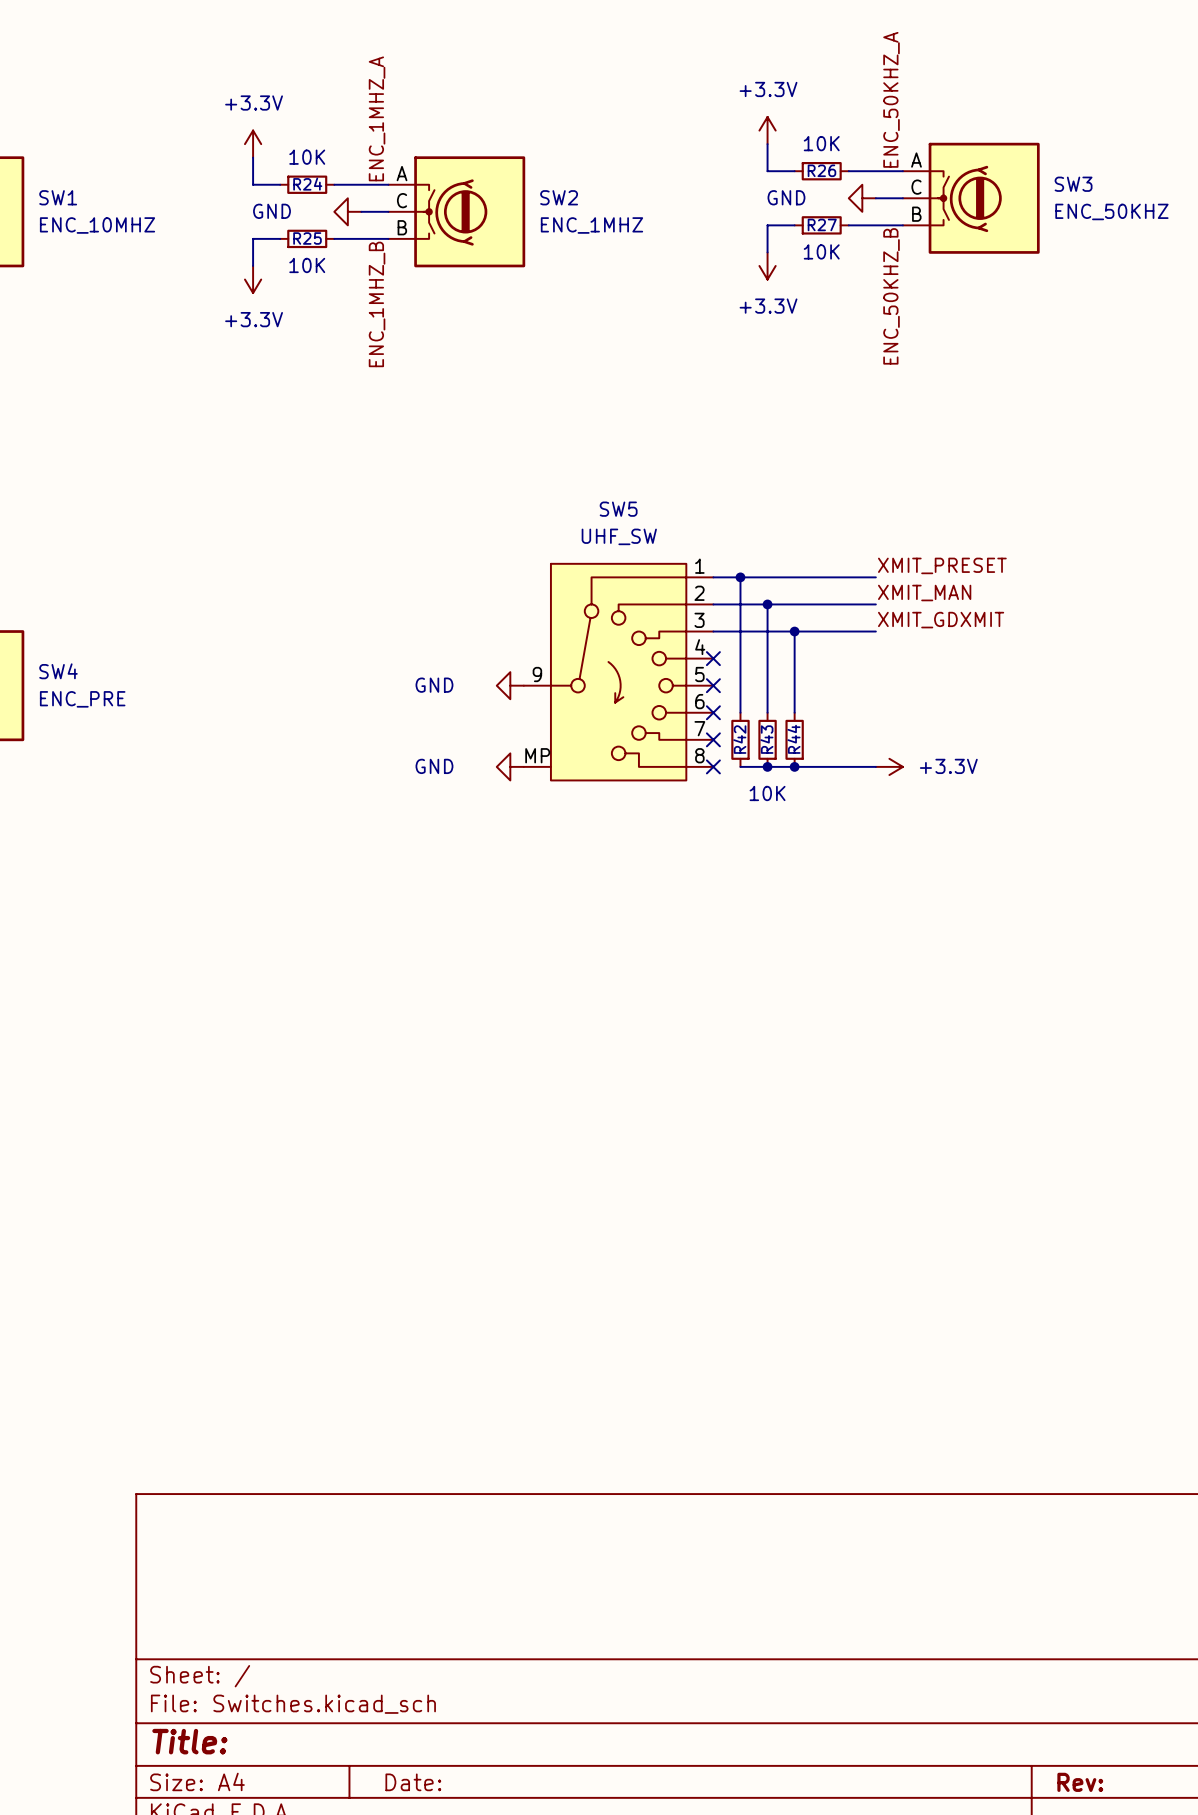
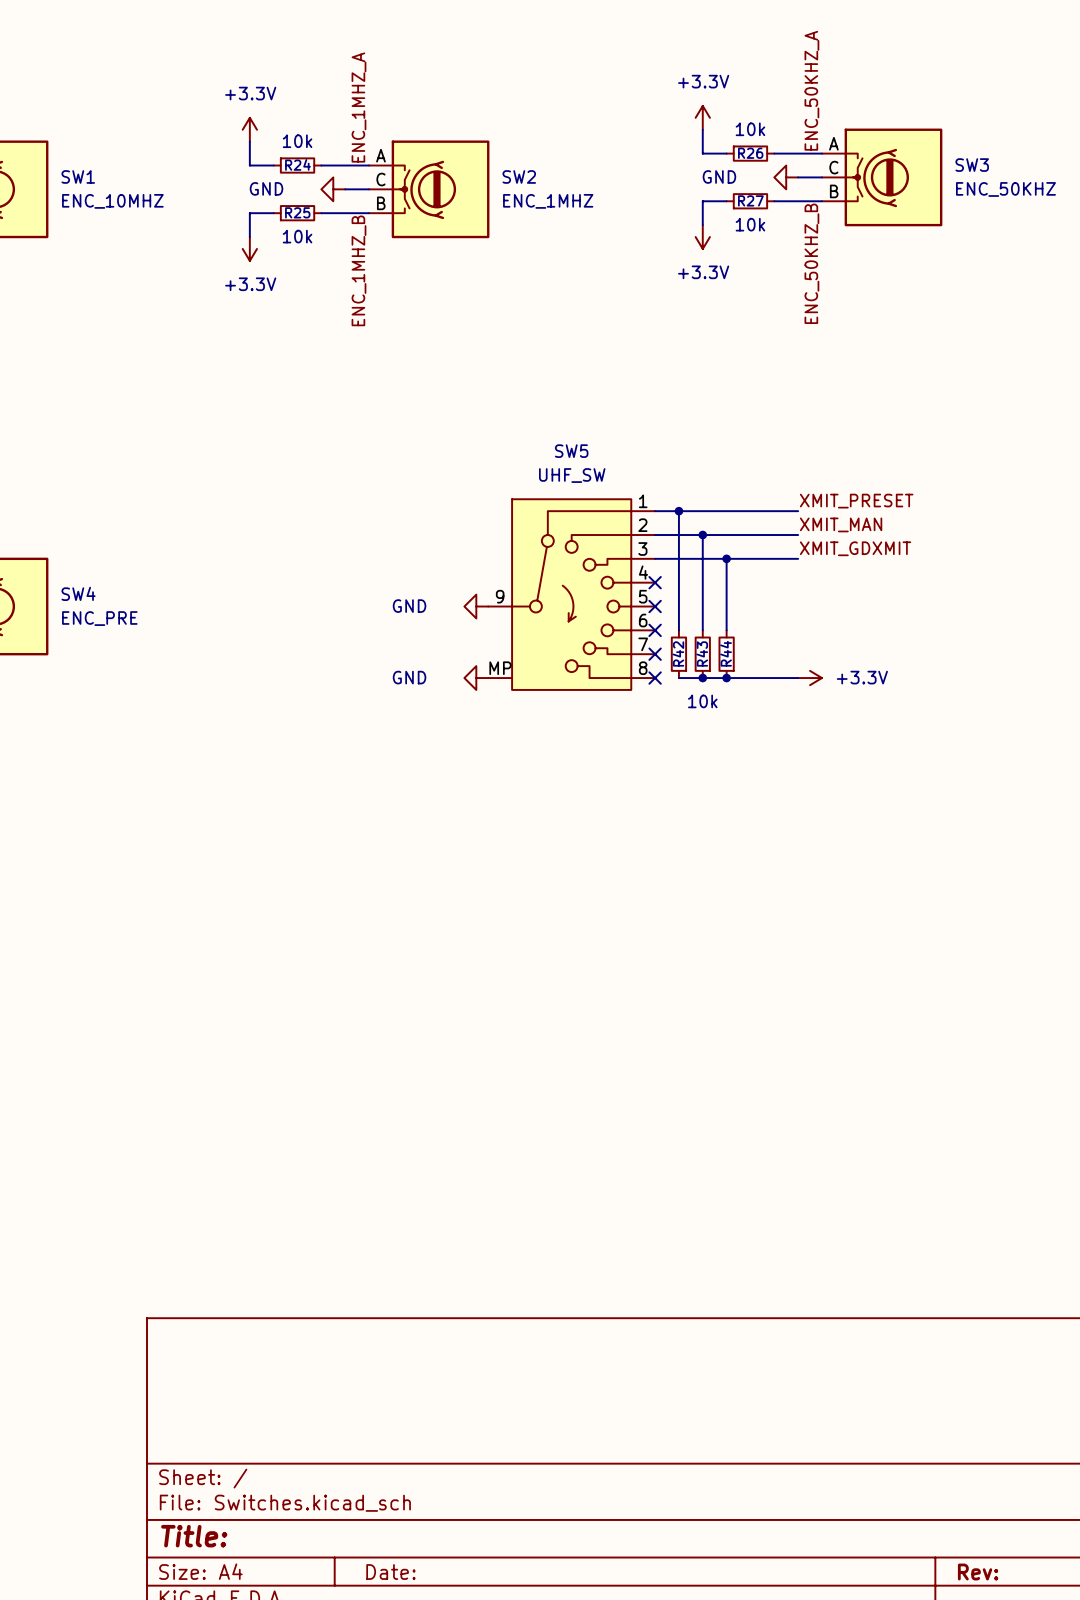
R26 value: 10K (821, 143) -> 10k (750, 129)
R24 value: 10K (307, 157) -> 10k (297, 141)
R27 value: 10K (821, 251) -> 10k (750, 224)
R25 value: 10K (307, 265) -> 10k (297, 236)
R44 value: 10K (767, 793) -> 10k (702, 701)

